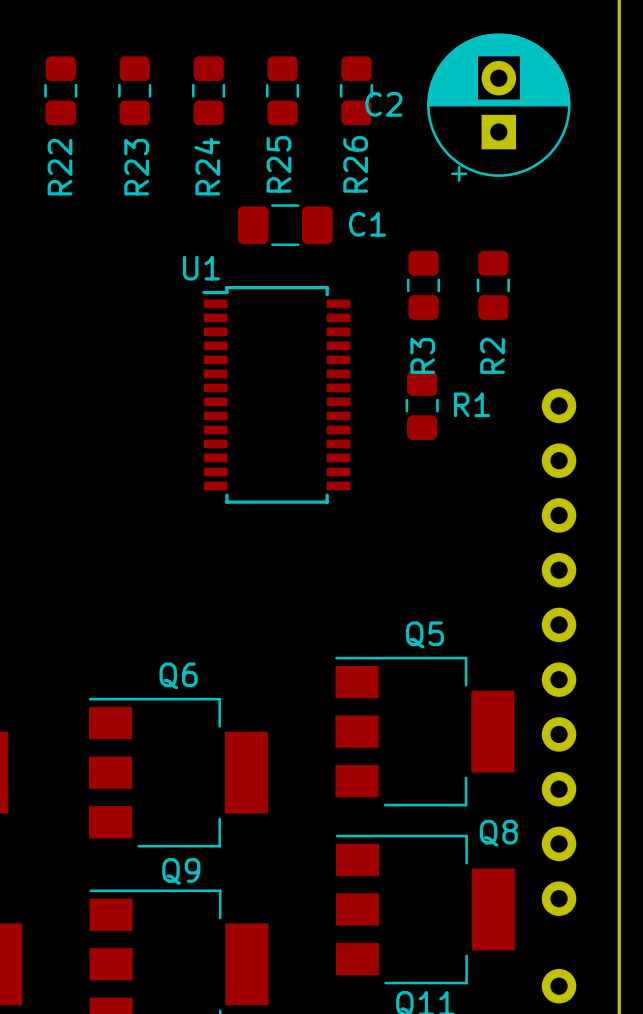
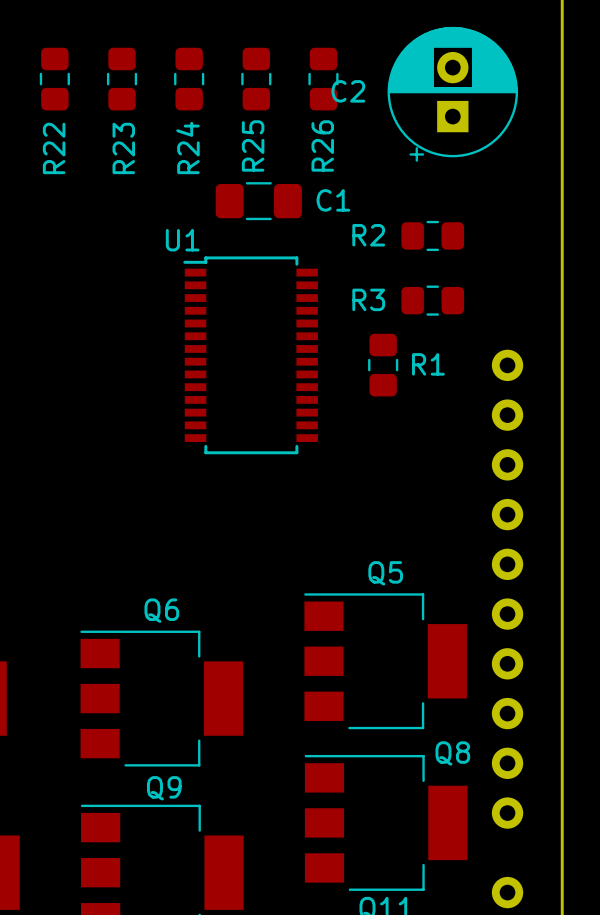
R3 rotation: 0° (423, 285) -> 90° clockwise (432, 300)
R3 position: (423, 285) -> (432, 300)
R2 rotation: 0° (493, 285) -> 90° clockwise (432, 235)

